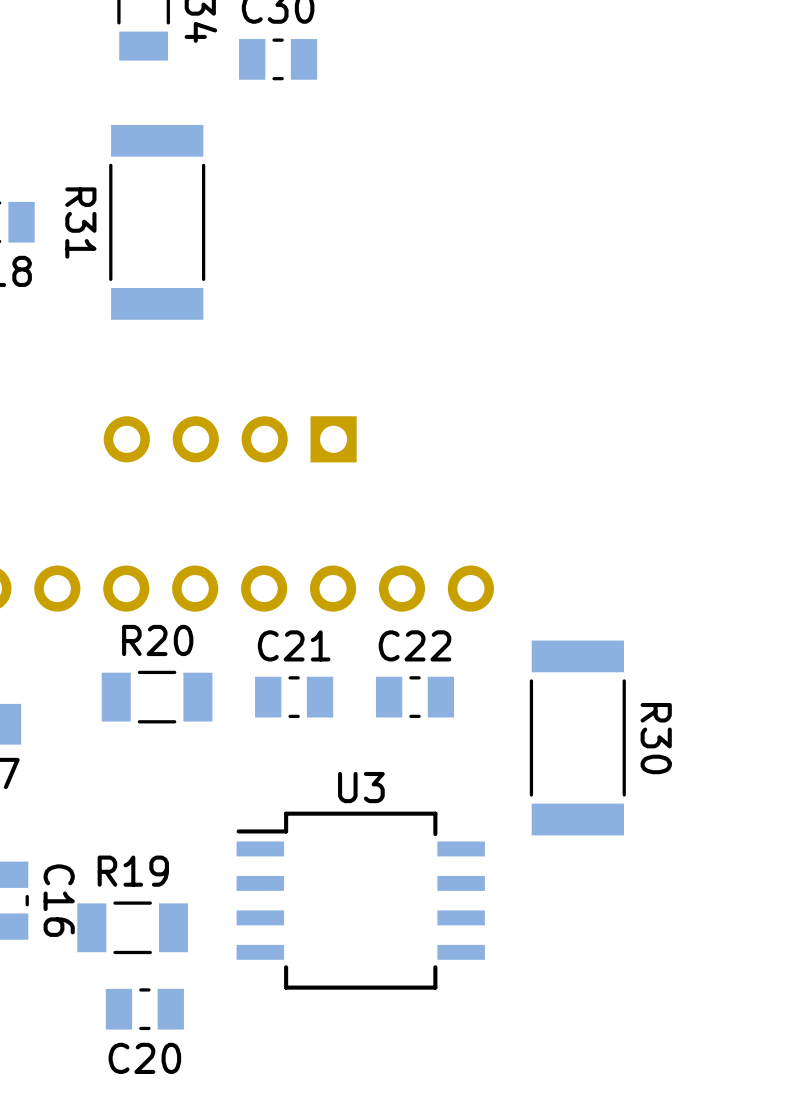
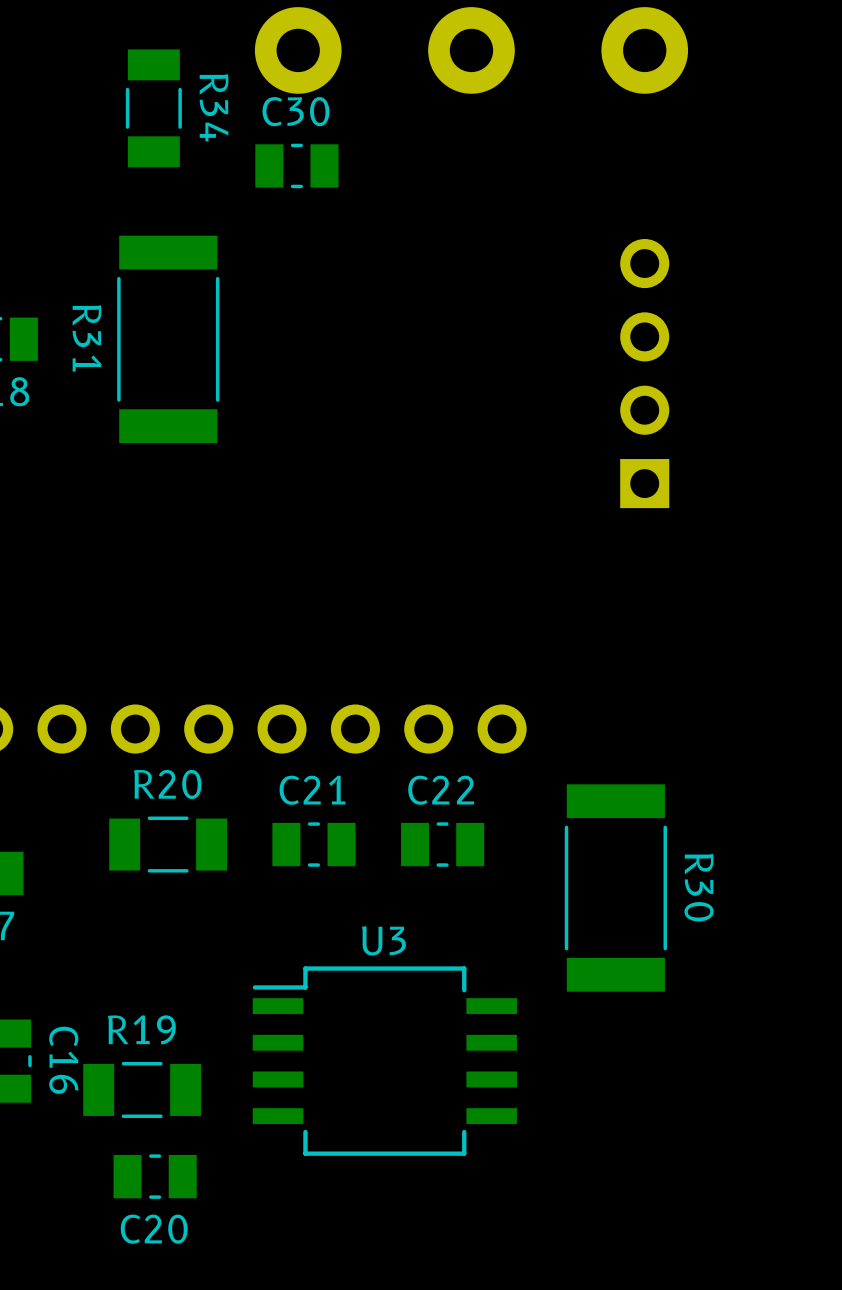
part rotation: 0° (230, 439) -> 90° clockwise (644, 373)
part position: (230, 439) -> (644, 373)

